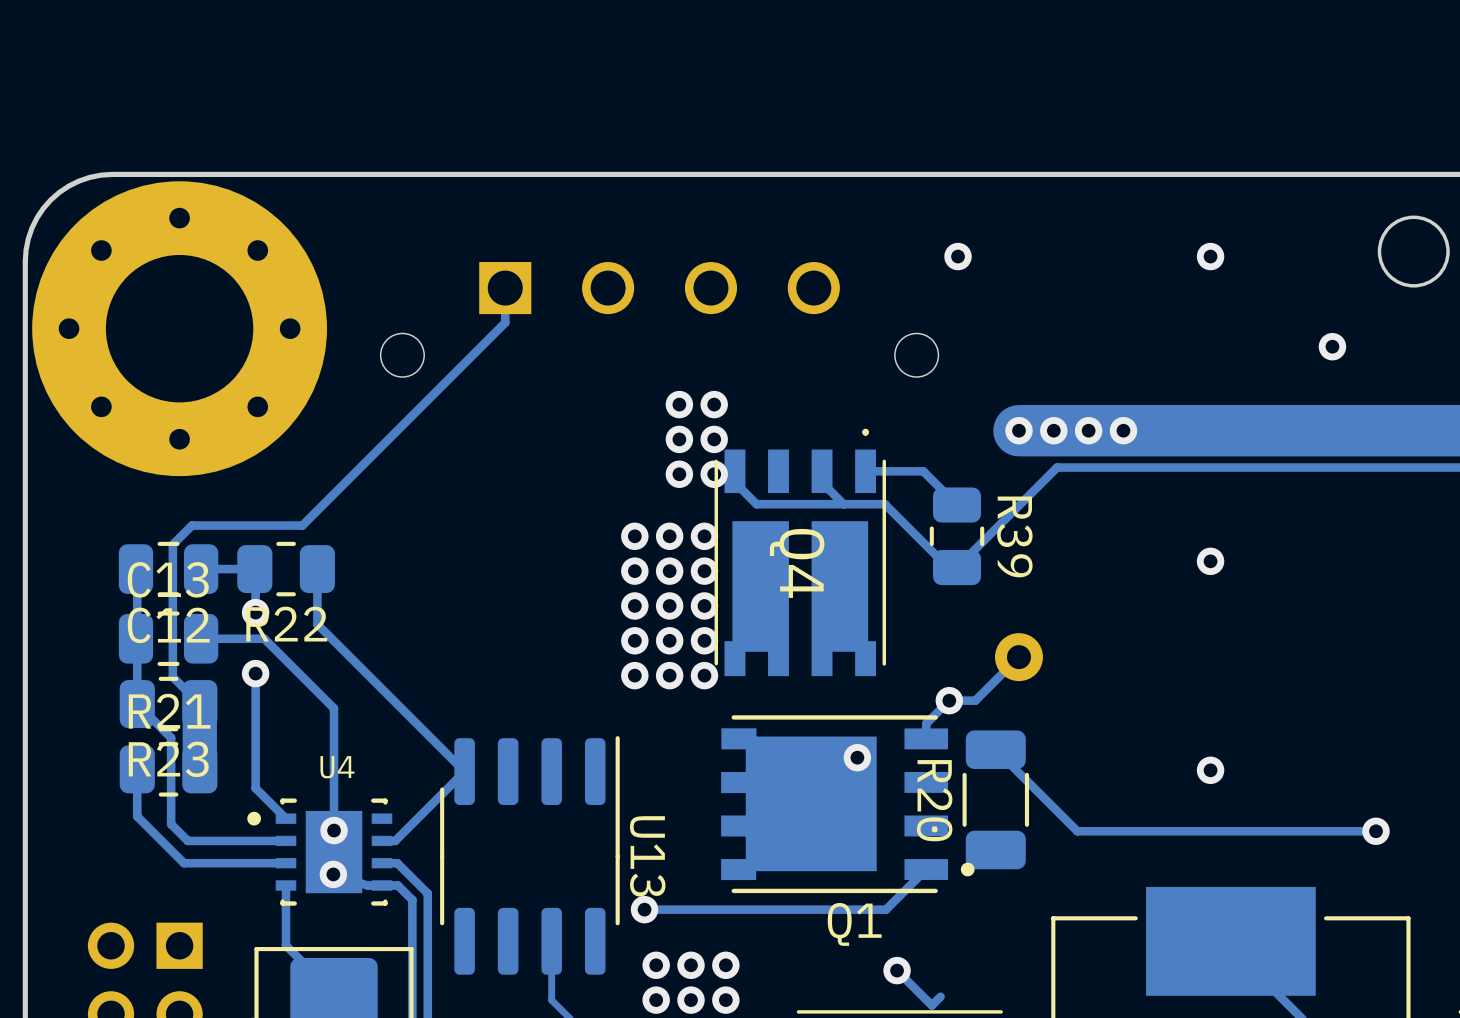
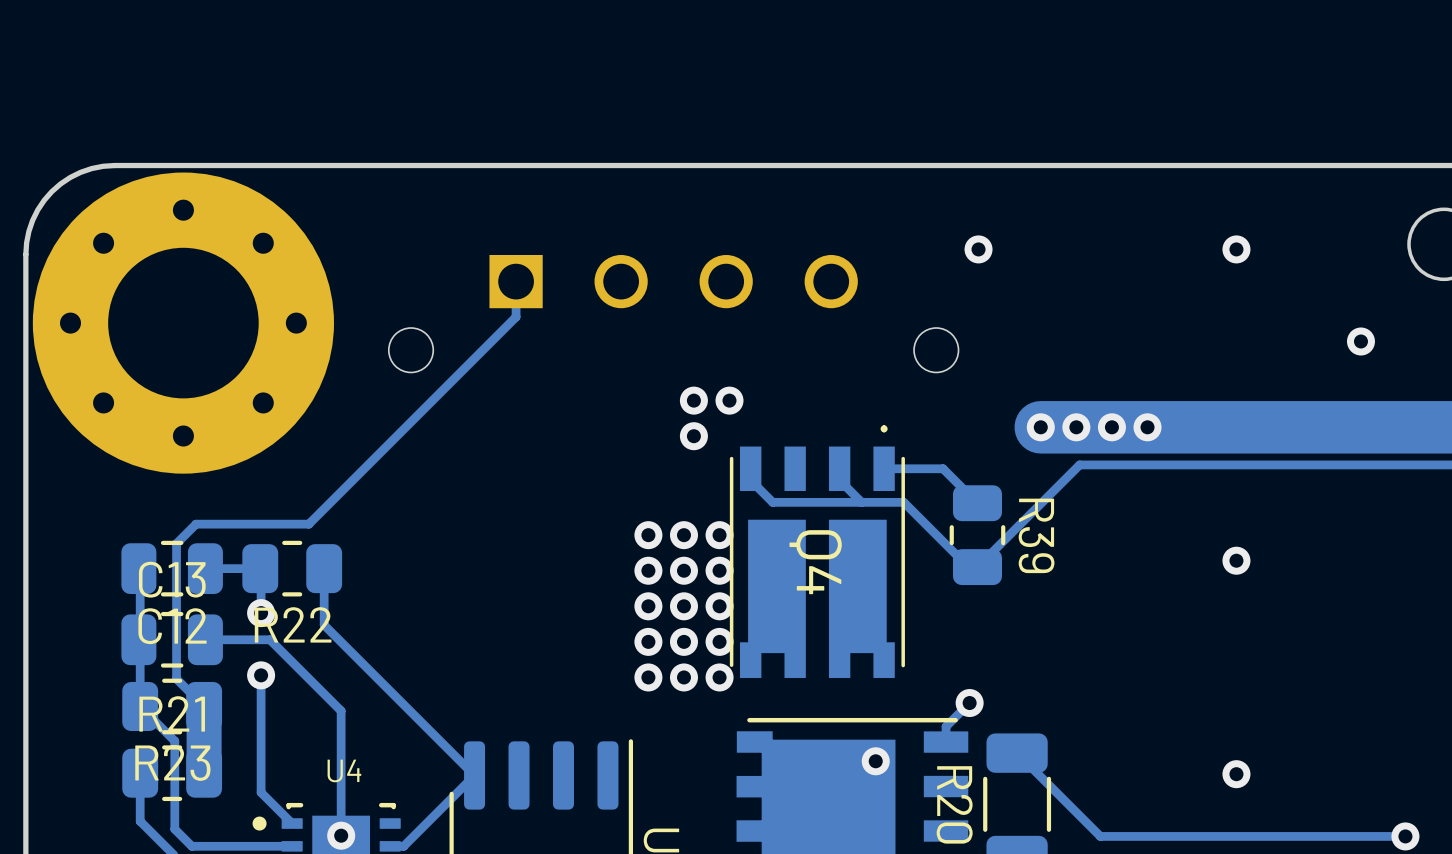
via: (714, 439) -> none
via: (679, 474) -> none
via: (714, 474) -> none
track: (1018, 657) (975, 700) (949, 700) -> none
part: (1018, 657) -> none

